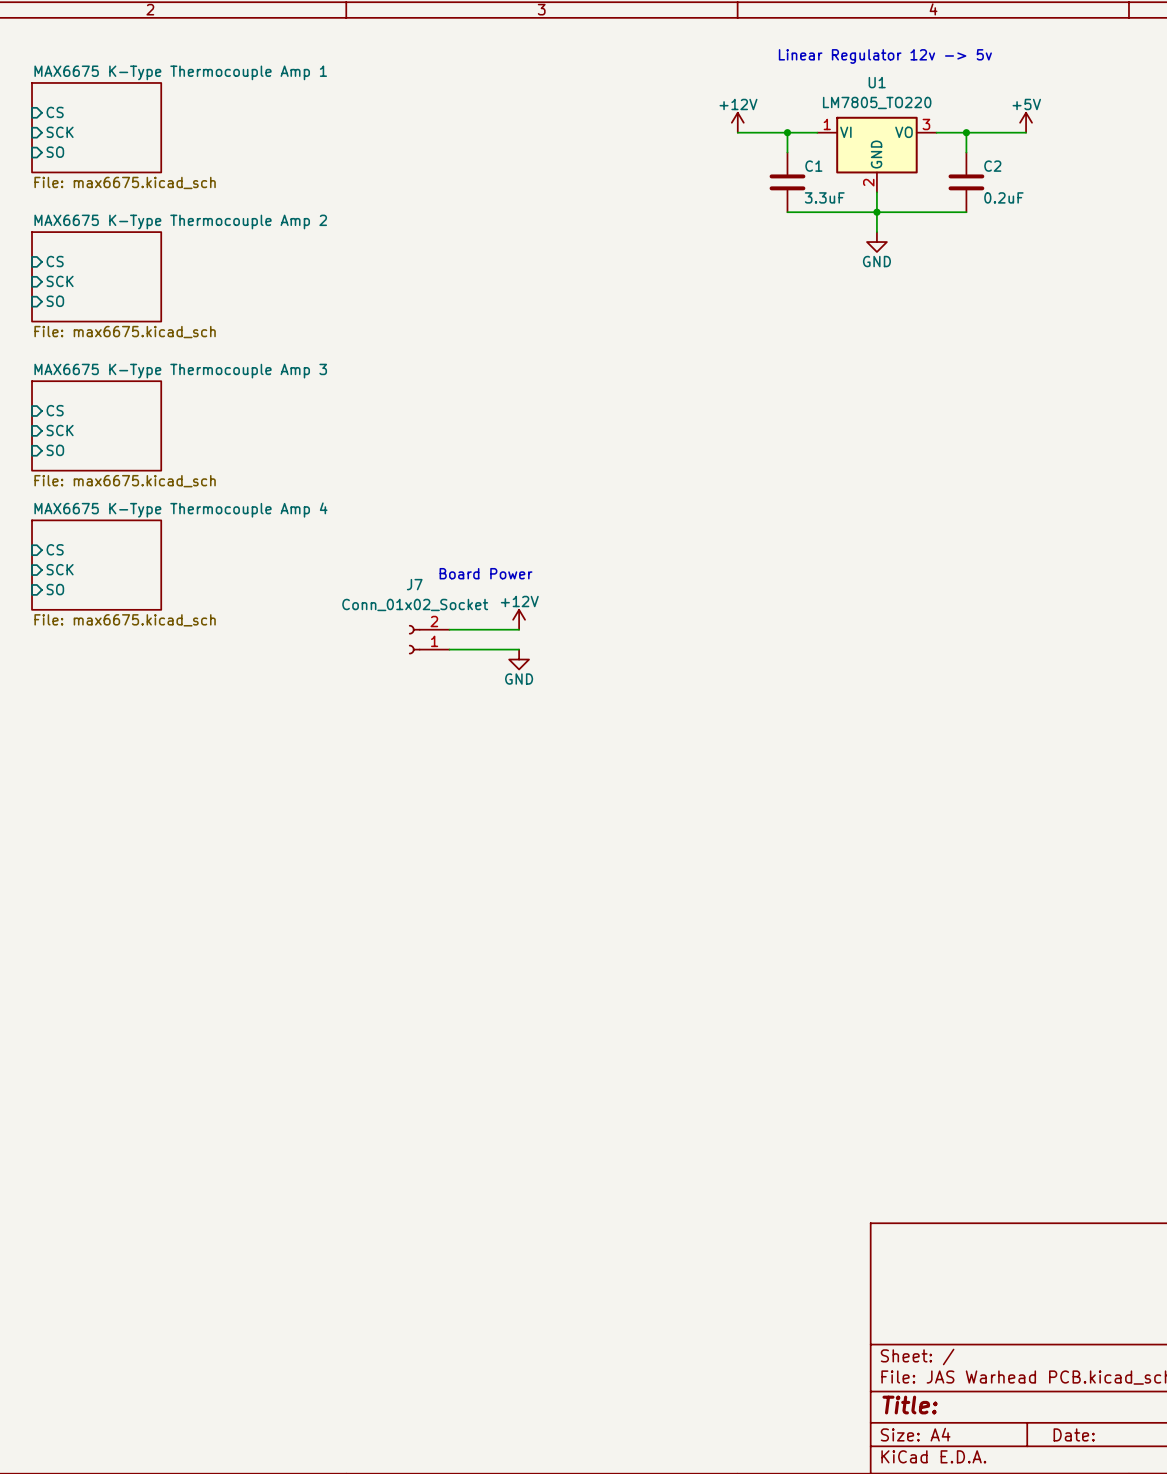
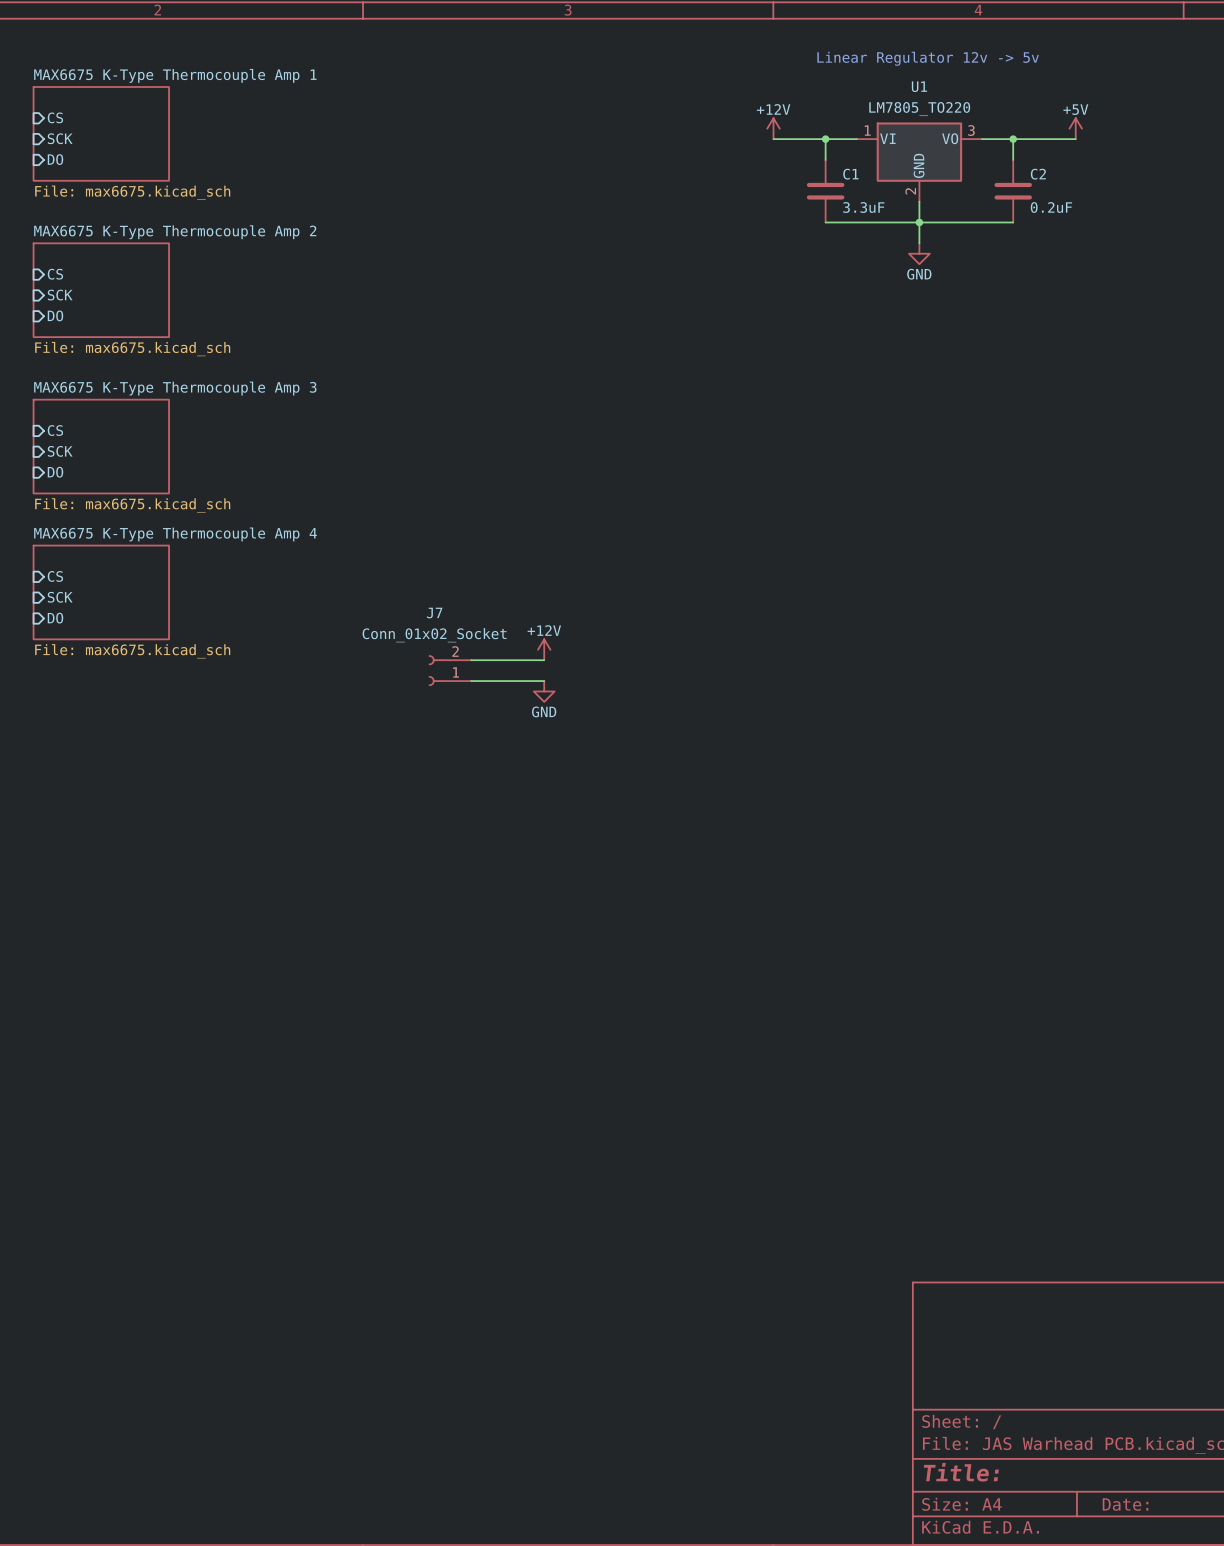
sheet pin: SO (55, 152) -> DO (55, 159)
sheet pin: SO (55, 301) -> DO (55, 315)
sheet pin: SO (55, 450) -> DO (55, 472)
text: Board Power (486, 573) -> none
sheet pin: SO (55, 589) -> DO (55, 618)

